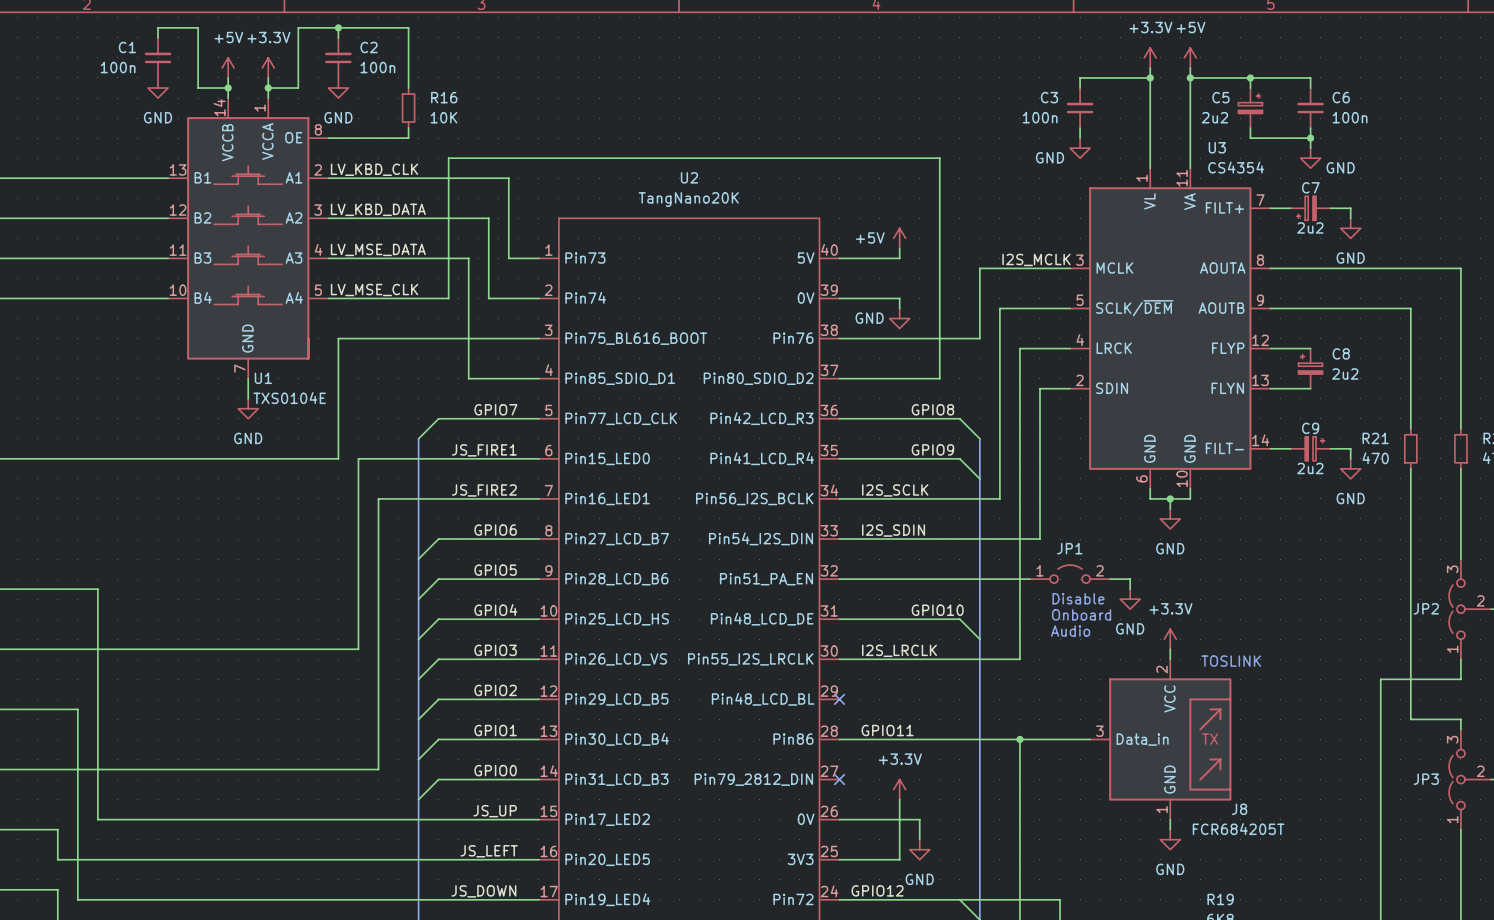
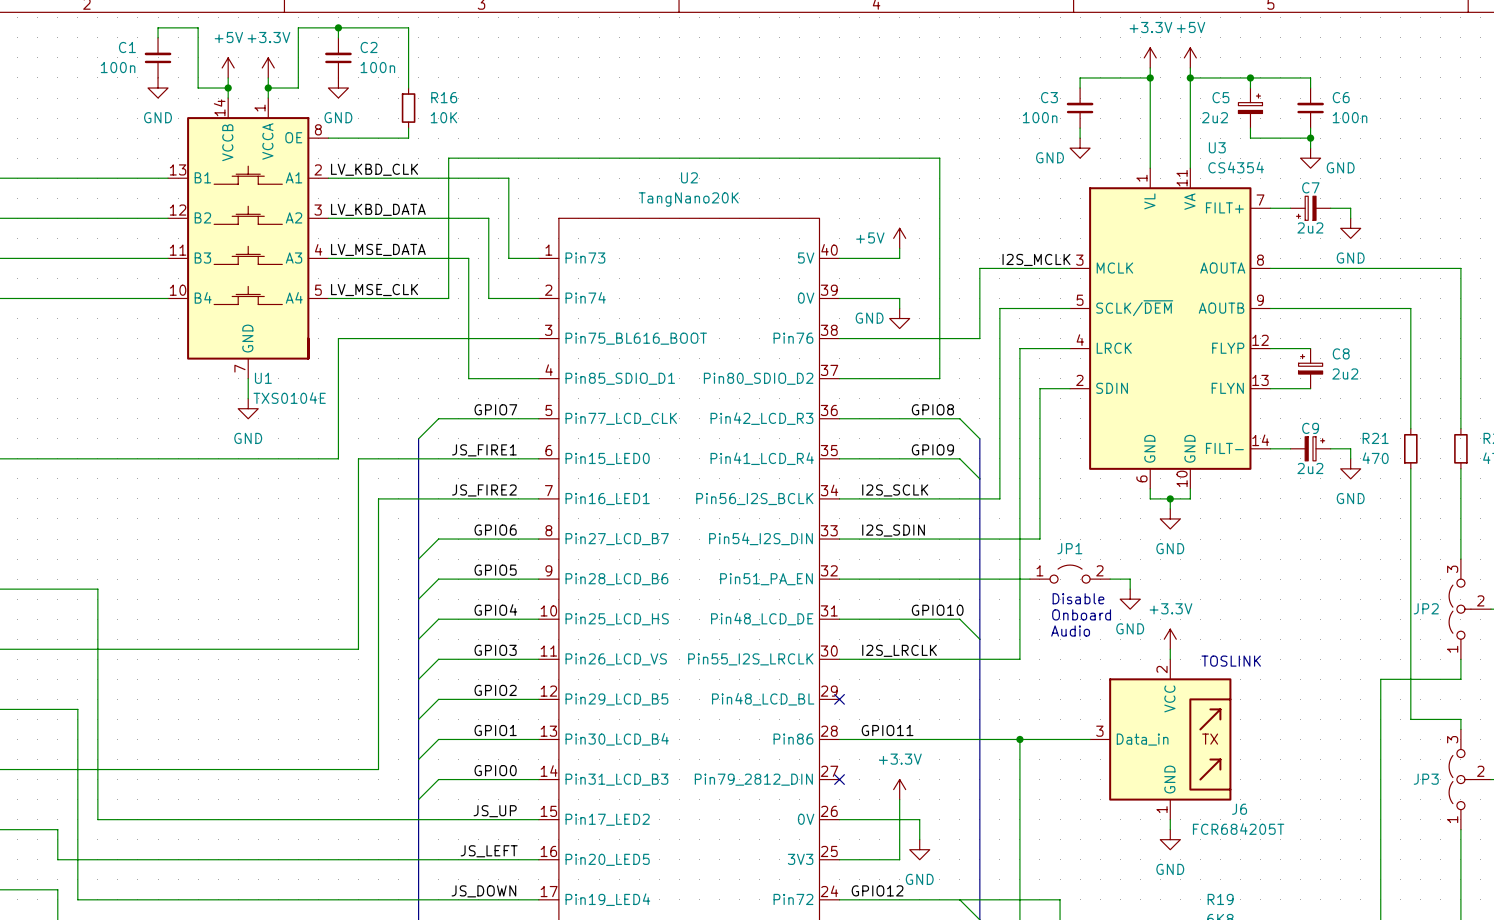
J8 name: J8 (1239, 809) -> J6 (1239, 809)

